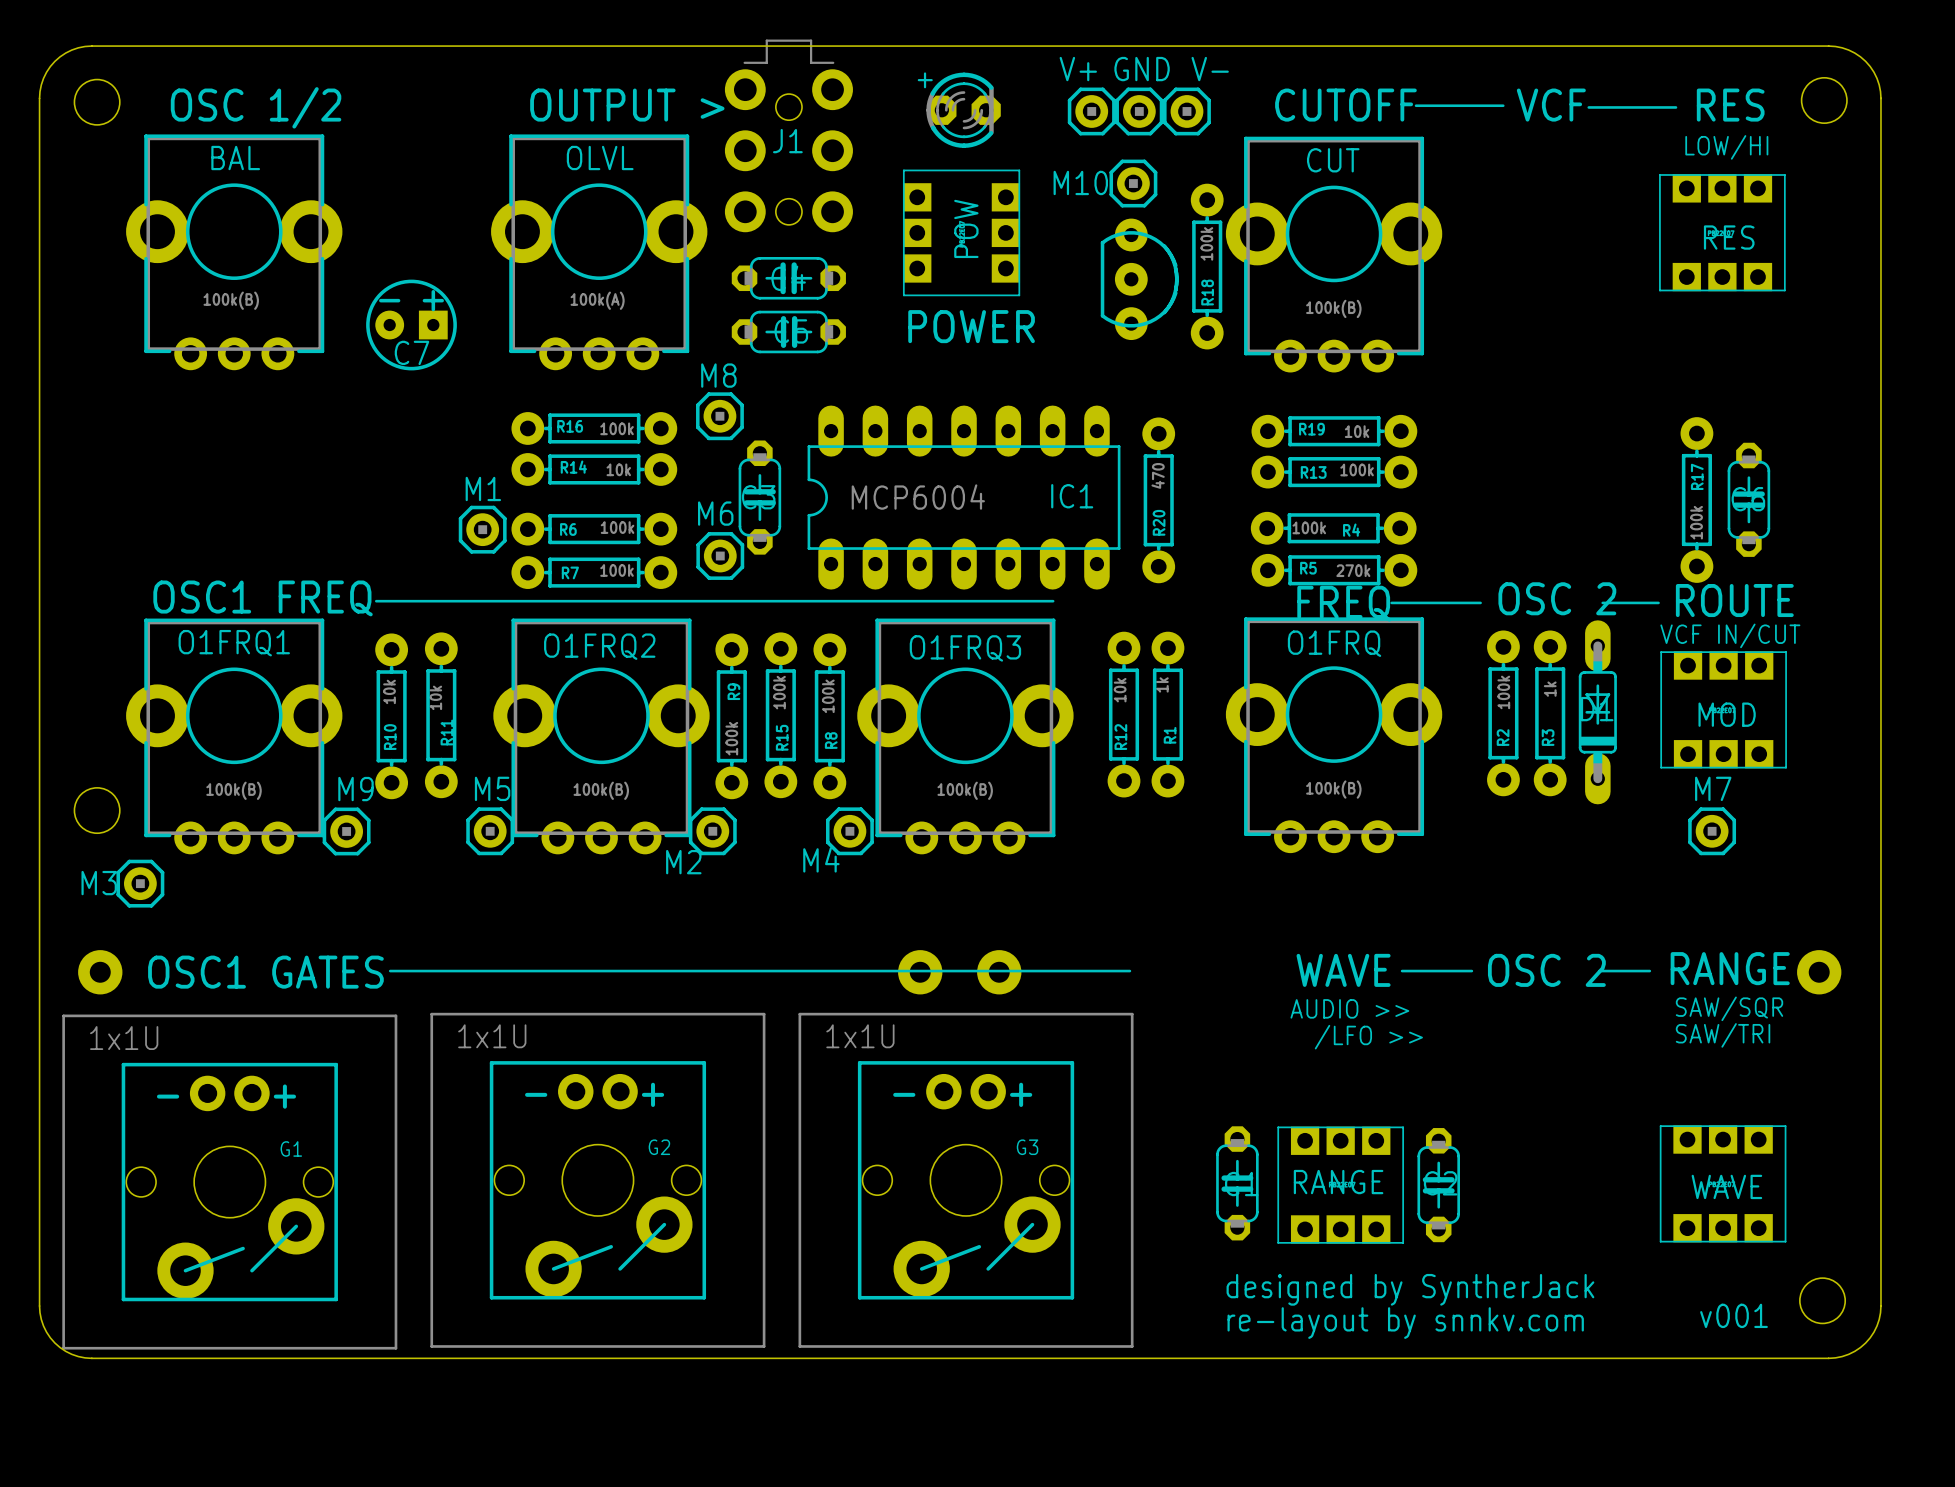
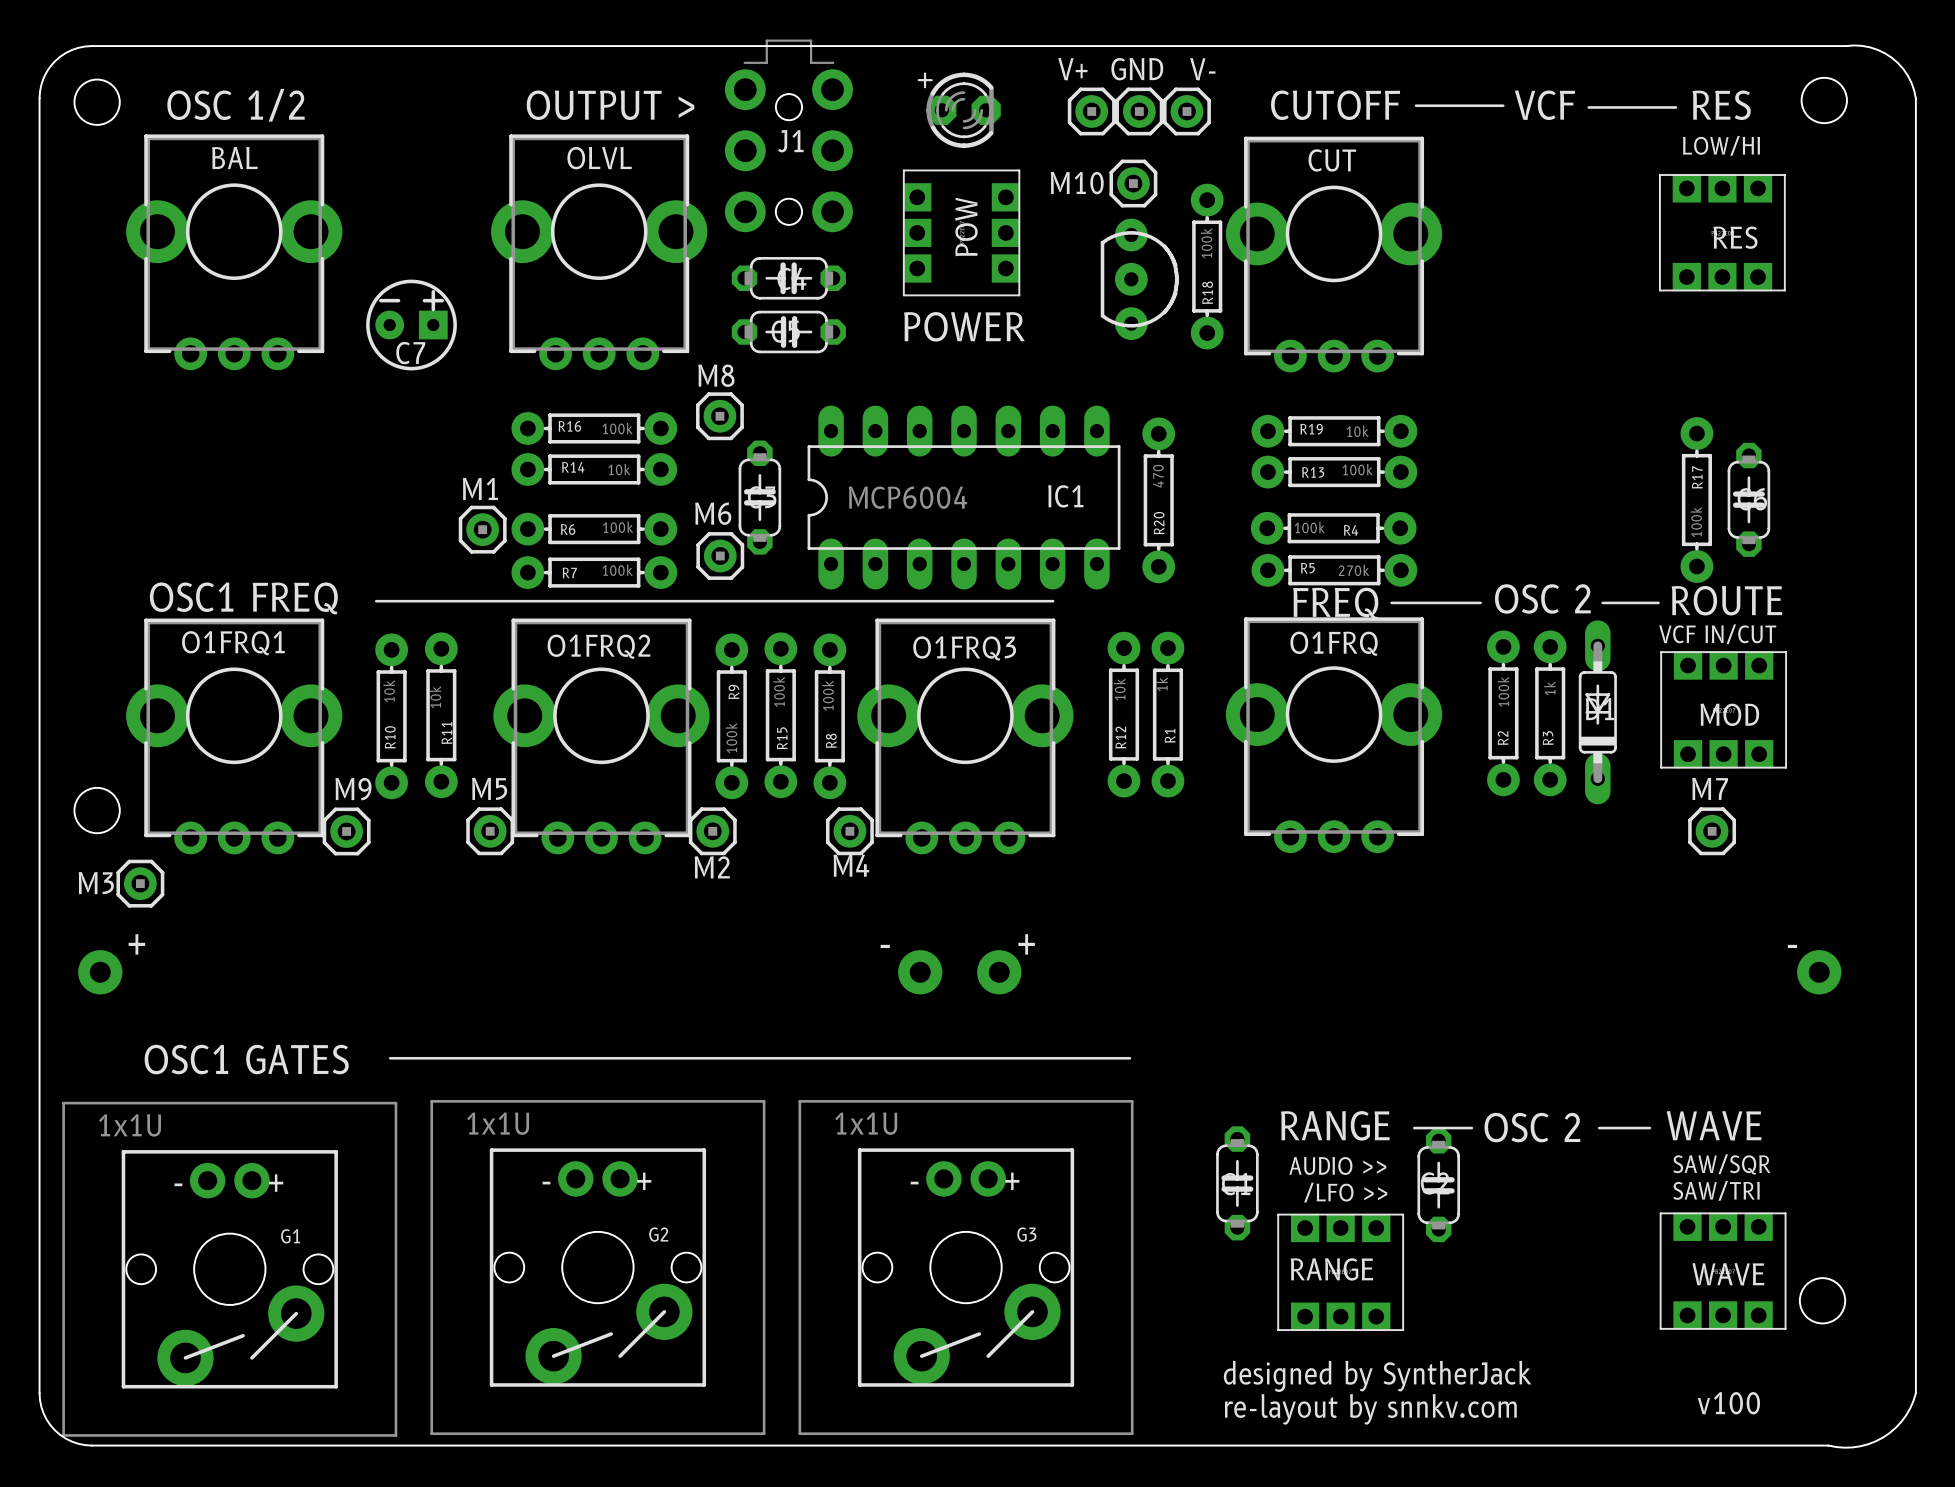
board edge: (1828, 46) (1848, 50) (1865, 61) (1876, 78) (1880, 98) (1880, 1306) (1879, 1319) (1873, 1332) (1860, 1347) (1842, 1356) (1828, 1358) (91, 1358) (71, 1354) (54, 1343) (43, 1326) (39, 1306) -> (1828, 46) (1862, 45) (1885, 53) (1903, 69) (1911, 82) (1915, 98) (1915, 1393) (1906, 1415) (1889, 1432) (1868, 1444) (1844, 1447) (1828, 1445) (85, 1445) (71, 1441) (60, 1434) (50, 1425) (41, 1406) (39, 1393) (39, 1306)
BAL value: 100k(B) (231, 300) -> none
OLVL value: 100k(A) (597, 300) -> none
CUT value: 100k(B) (1333, 308) -> none
O1FRQ value: 100k(B) (1333, 789) -> none
O1FRQ1 value: 100k(B) (234, 790) -> none
O1FRQ2 value: 100k(B) (601, 790) -> none
O1FRQ3 value: 100k(B) (965, 790) -> none
M4 name position: M4 (821, 859) -> M4 (851, 865)
M2 name position: M2 (683, 862) -> M2 (712, 867)
text: none -> + (136, 944)
text: none -> - (885, 946)
text: none -> + (1026, 944)
text: none -> - (1792, 946)
text position: RANGE (1730, 968) -> RANGE (1335, 1125)
text position: WAVE (1343, 970) -> WAVE (1714, 1125)
text position: OSC 2 (1546, 970) -> OSC 2 (1532, 1127)
line: (390, 971) (1129, 971) -> (390, 1058) (1129, 1058)
line: (1402, 971) (1471, 971) -> none
line: (1599, 971) (1649, 971) -> (1599, 1128) (1649, 1128)
text position: OSC1 GATES (265, 972) -> OSC1 GATES (246, 1059)
text position: AUDIO >> (1349, 1008) -> AUDIO >> (1337, 1165)
text position: SAW/SQR (1729, 1008) -> SAW/SQR (1721, 1164)
text position: SAW/TRI (1723, 1035) -> SAW/TRI (1716, 1190)
text position: /LFO >> (1368, 1037) -> /LFO >> (1345, 1192)
line: none -> (1414, 1128) (1471, 1128)
G2 position: (597, 1180) -> (597, 1267)
G3 position: (966, 1180) -> (966, 1267)
G1 position: (229, 1182) -> (229, 1269)
WAVE position: (1723, 1183) -> (1723, 1271)
RANGE position: (1340, 1185) -> (1340, 1272)
text position: designed by SyntherJack (1410, 1289) -> designed by SyntherJack (1377, 1376)
text: v001 (1733, 1315) -> none
text position: re-layout by snnkv.com (1405, 1323) -> re-layout by snnkv.com (1370, 1409)
text: none -> v100 (1728, 1403)

